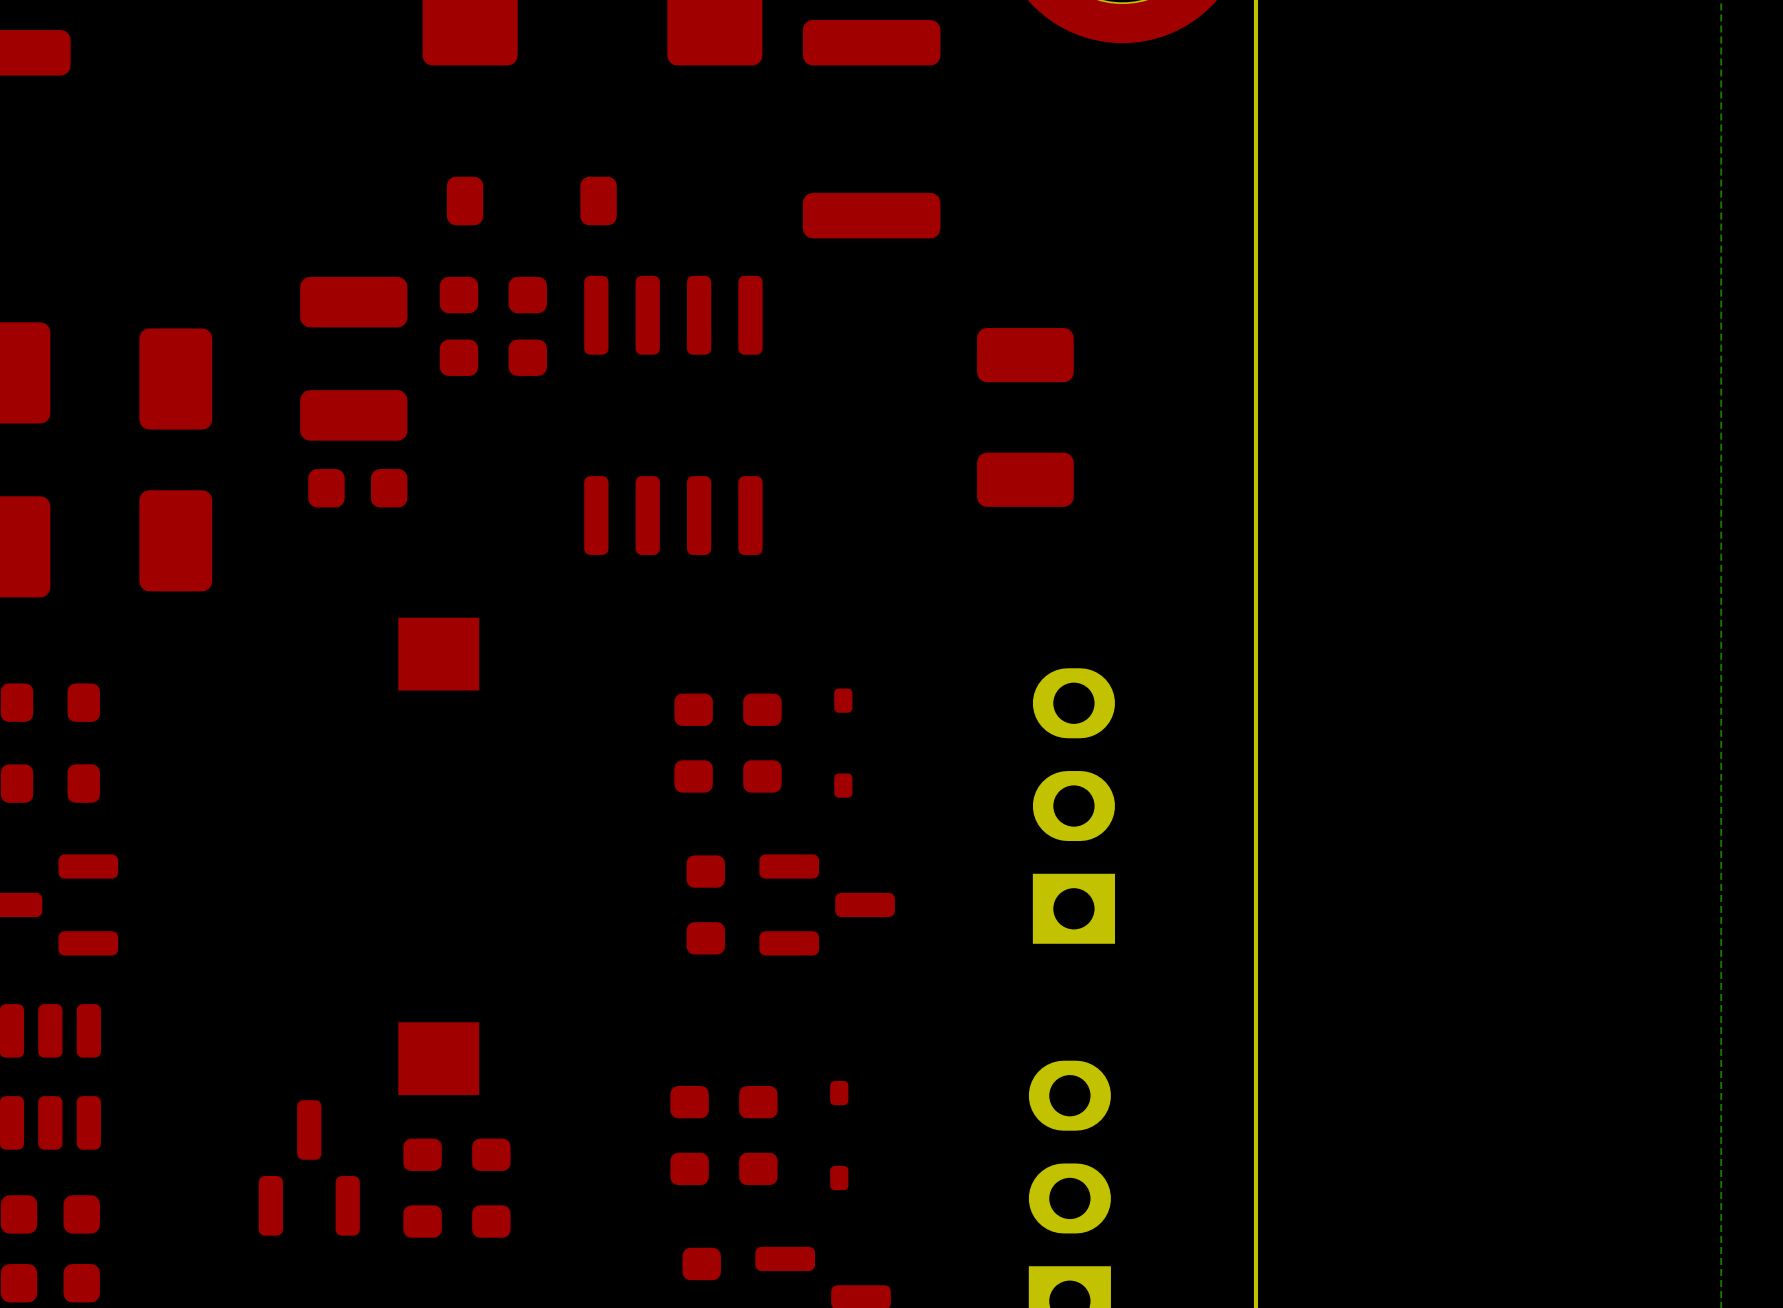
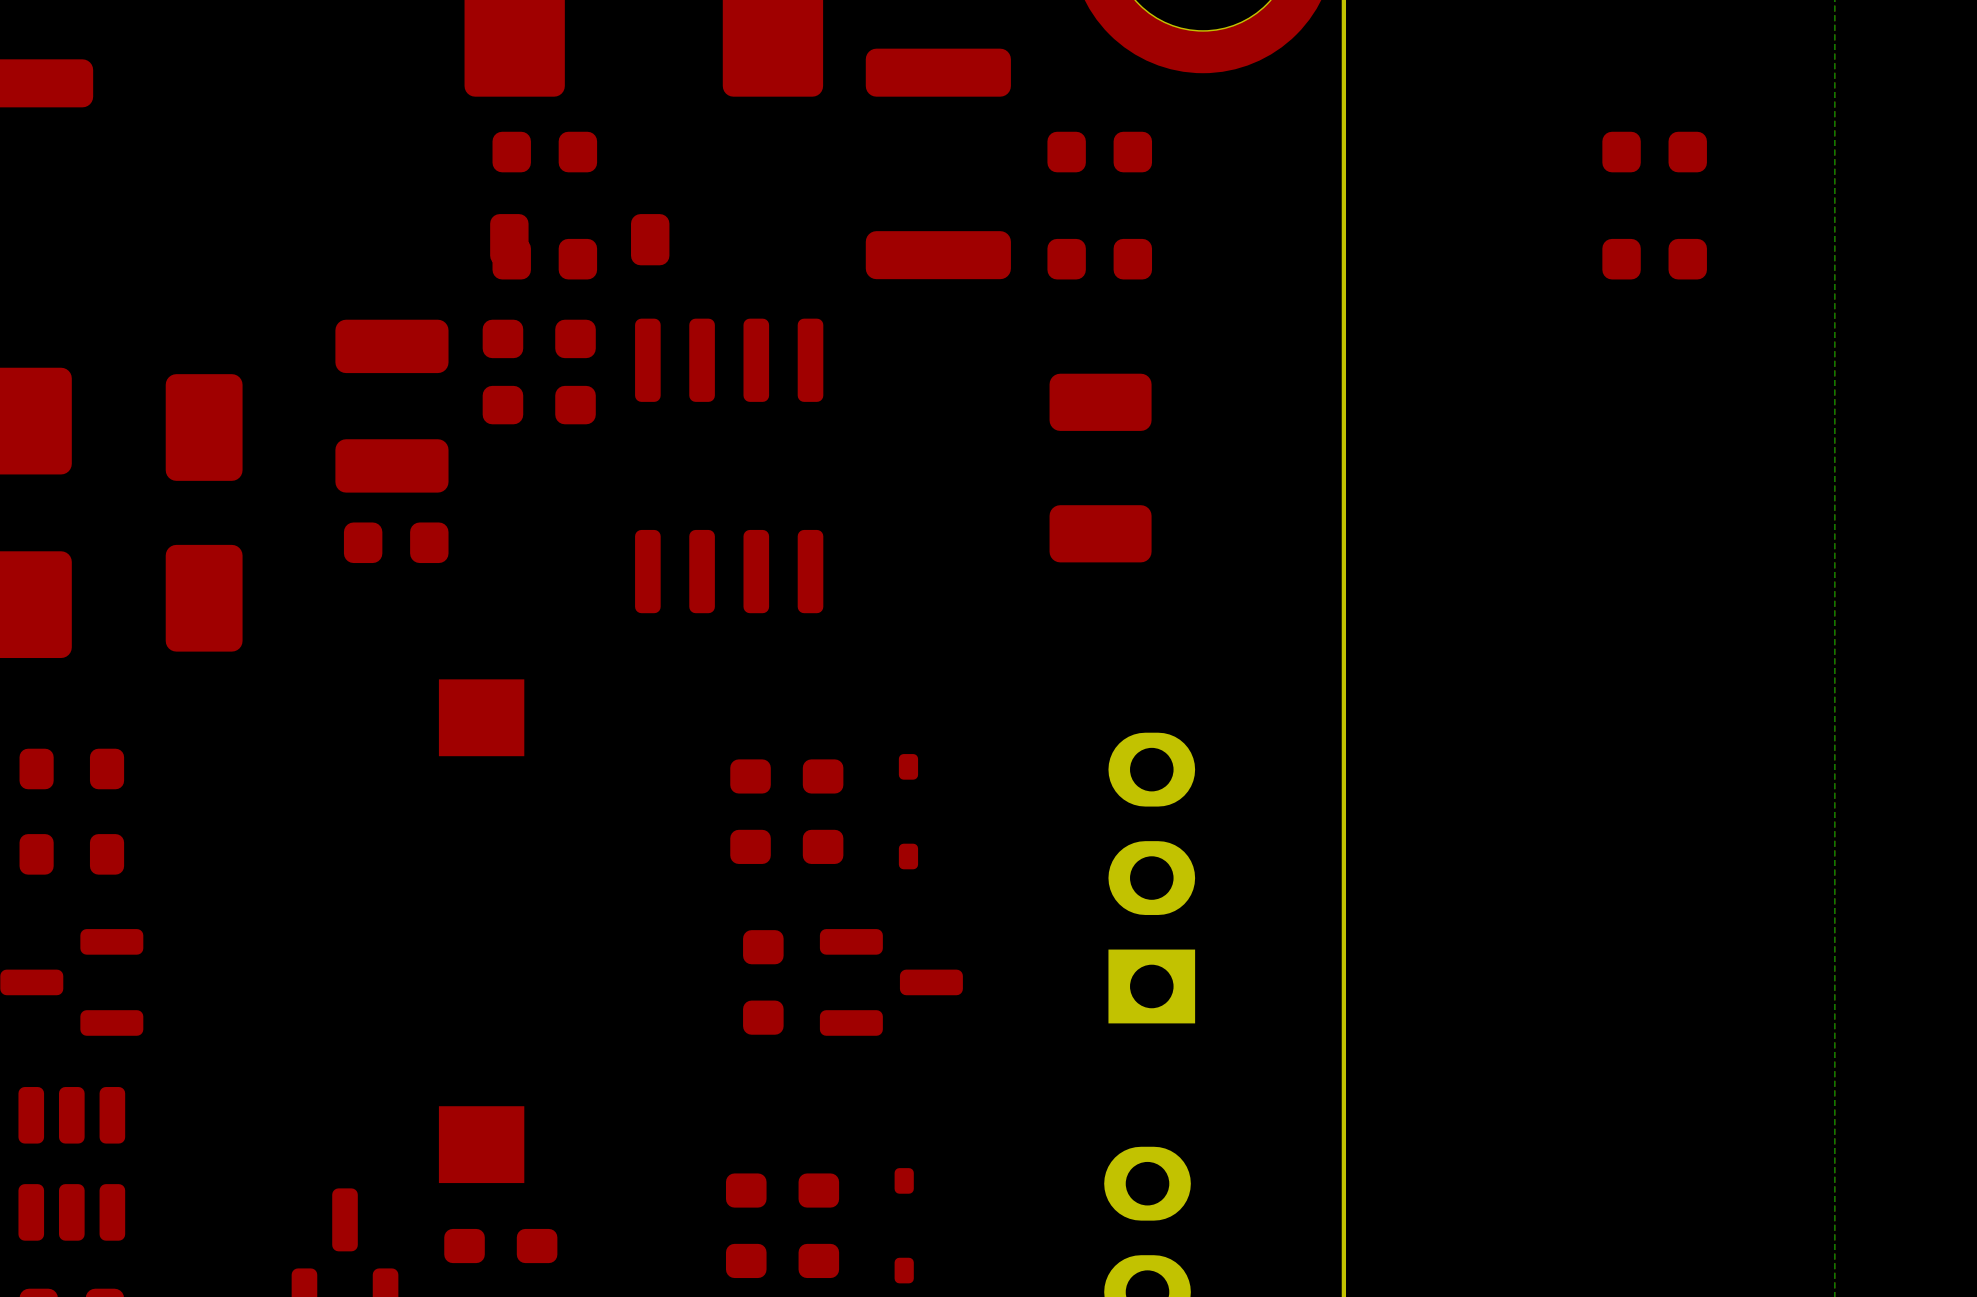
part: none -> (544, 152)
part: none -> (1099, 152)
part: none -> (1654, 152)
part: none -> (544, 259)
part: none -> (1099, 259)
part: none -> (1654, 259)

